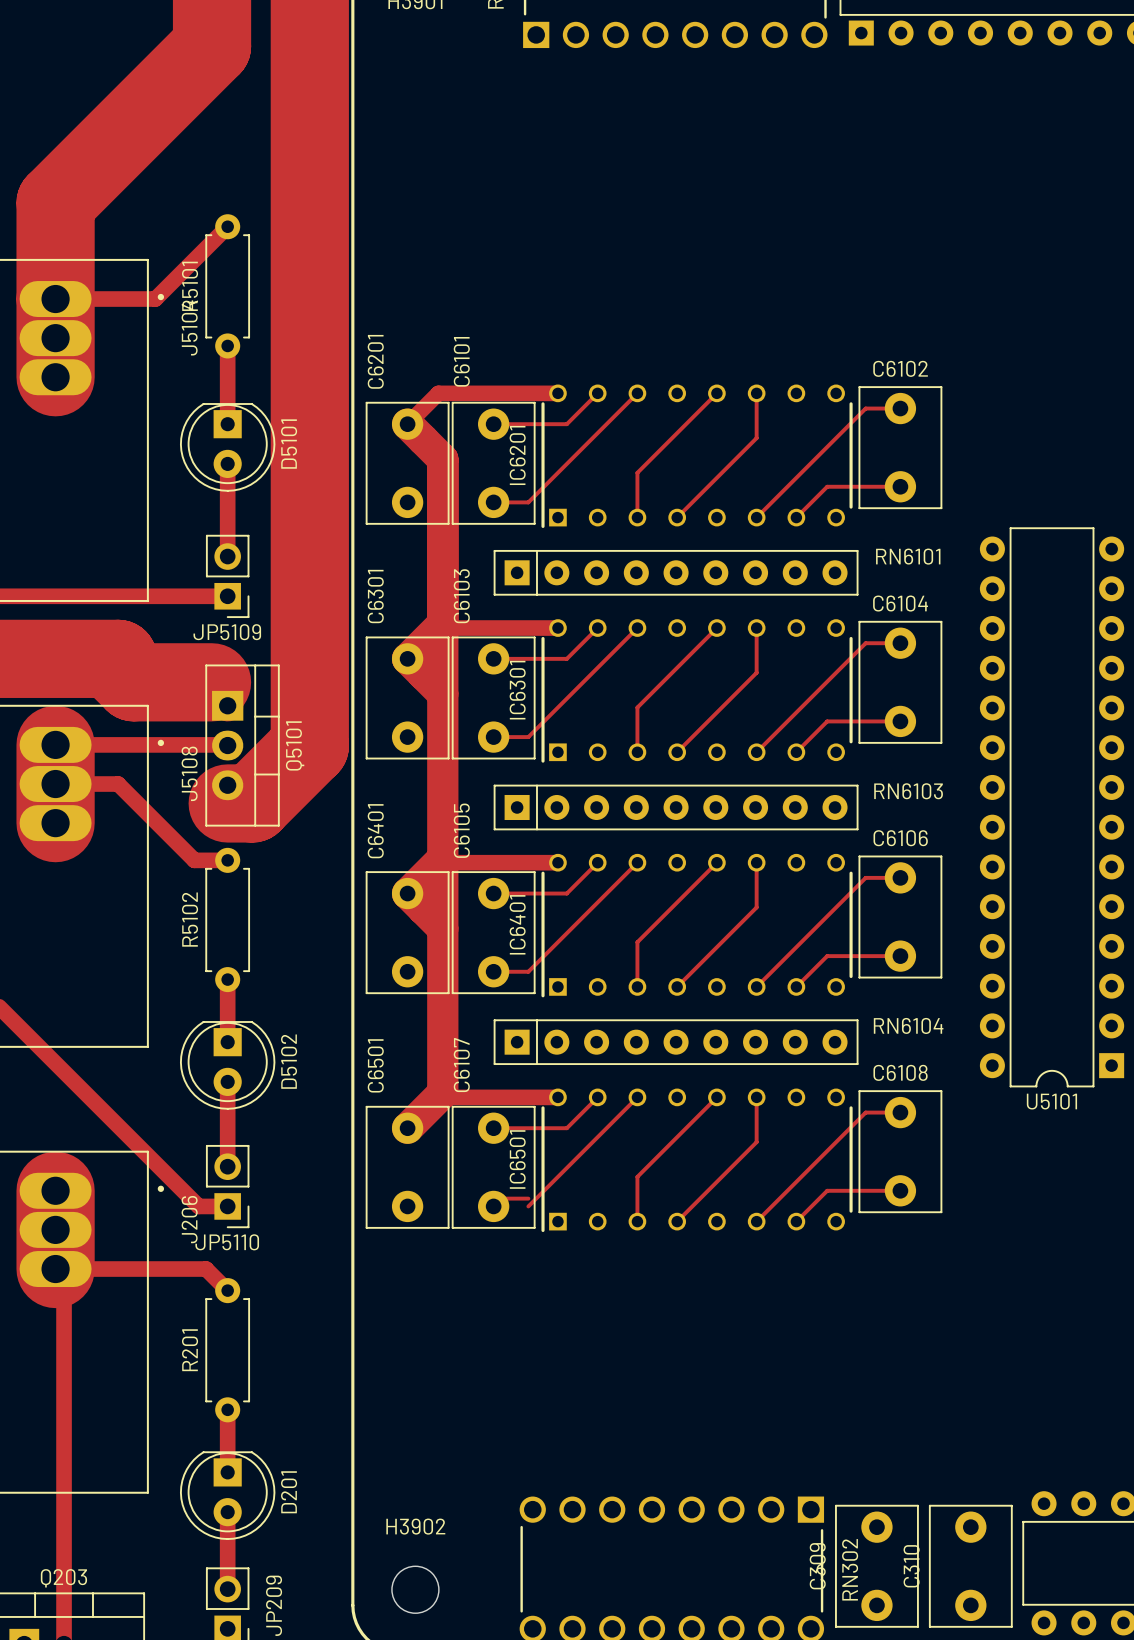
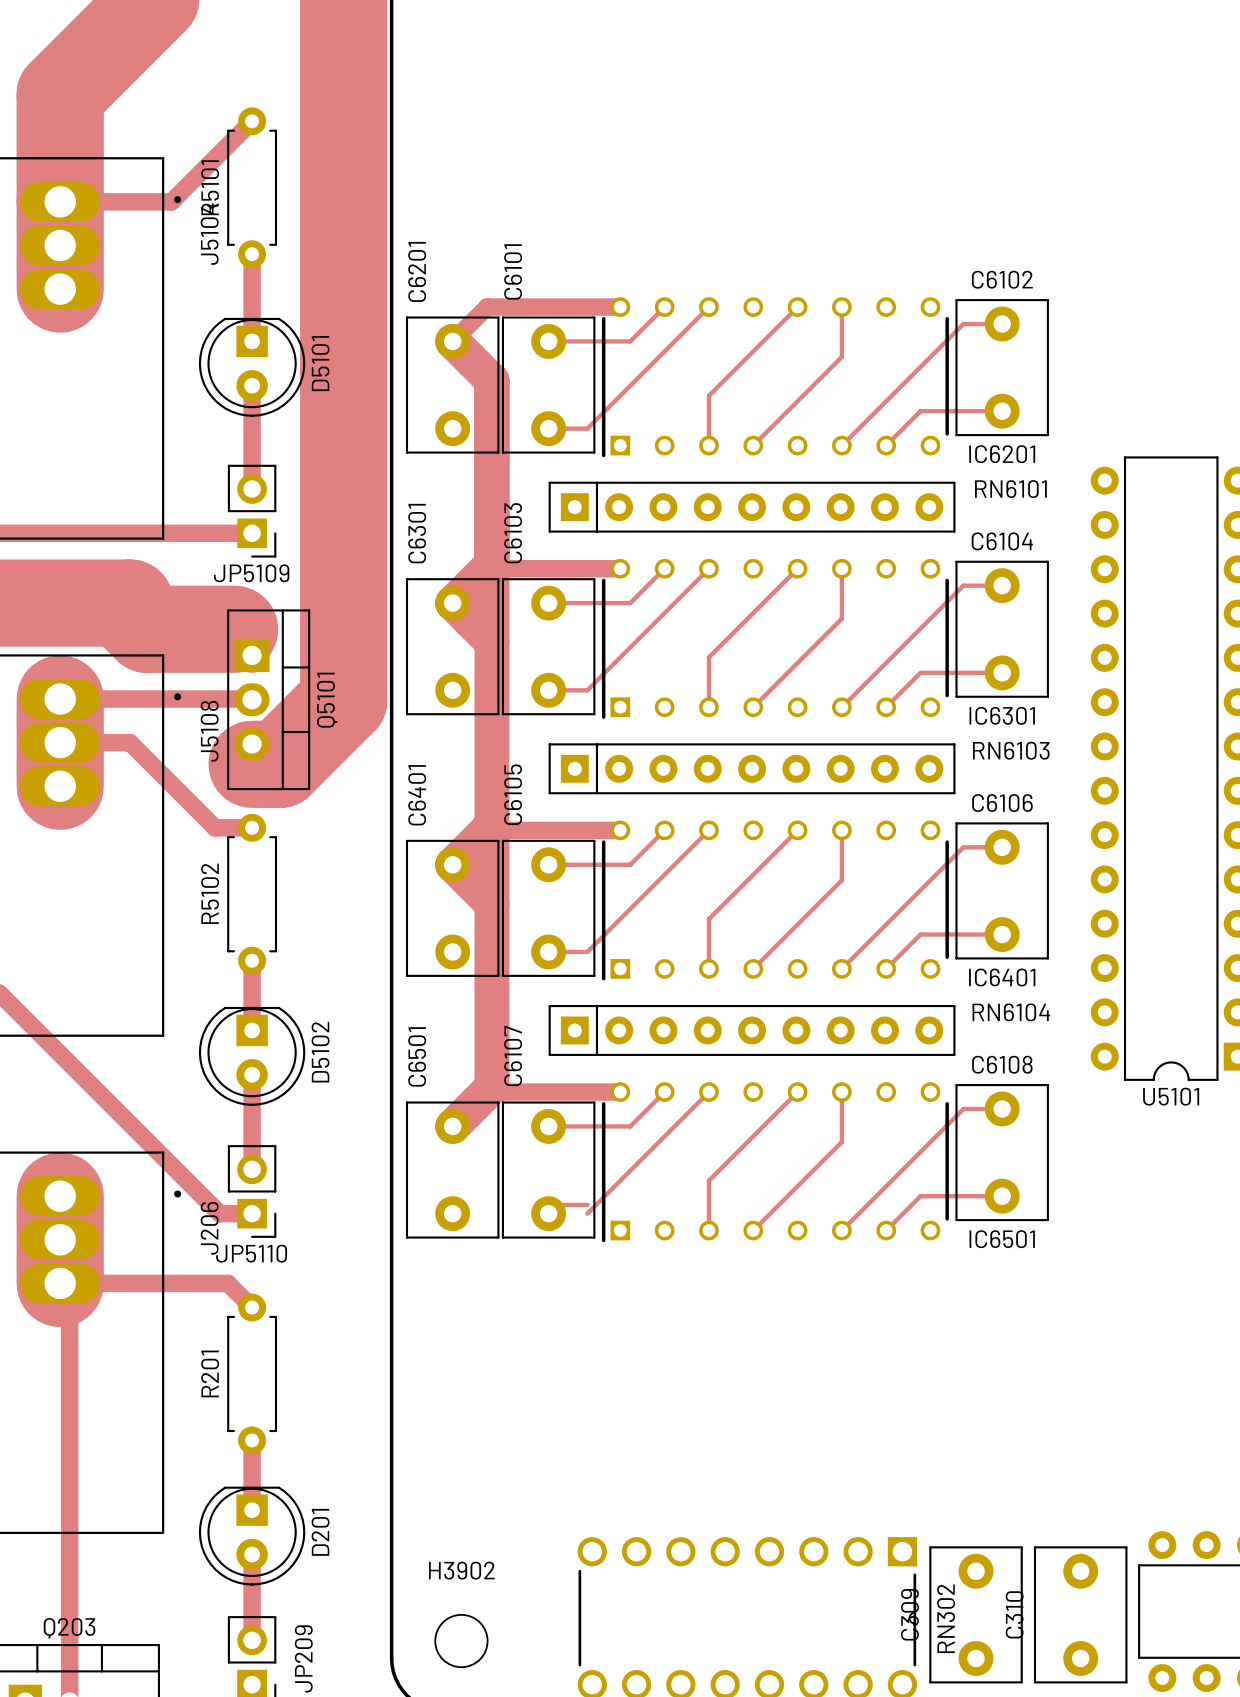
IC6201 name rotation: 0° (517, 455) -> 90° clockwise (1002, 454)
IC6201 name position: IC6201 (517, 455) -> IC6201 (1002, 454)
IC6301 name rotation: 0° (517, 690) -> 90° clockwise (1002, 715)
IC6301 name position: IC6301 (517, 690) -> IC6301 (1002, 715)
IC6401 name rotation: 0° (517, 924) -> 90° clockwise (1002, 977)
IC6401 name position: IC6401 (517, 924) -> IC6401 (1002, 977)
IC6501 name rotation: 0° (517, 1159) -> 90° clockwise (1002, 1239)
IC6501 name position: IC6501 (517, 1159) -> IC6501 (1002, 1239)

